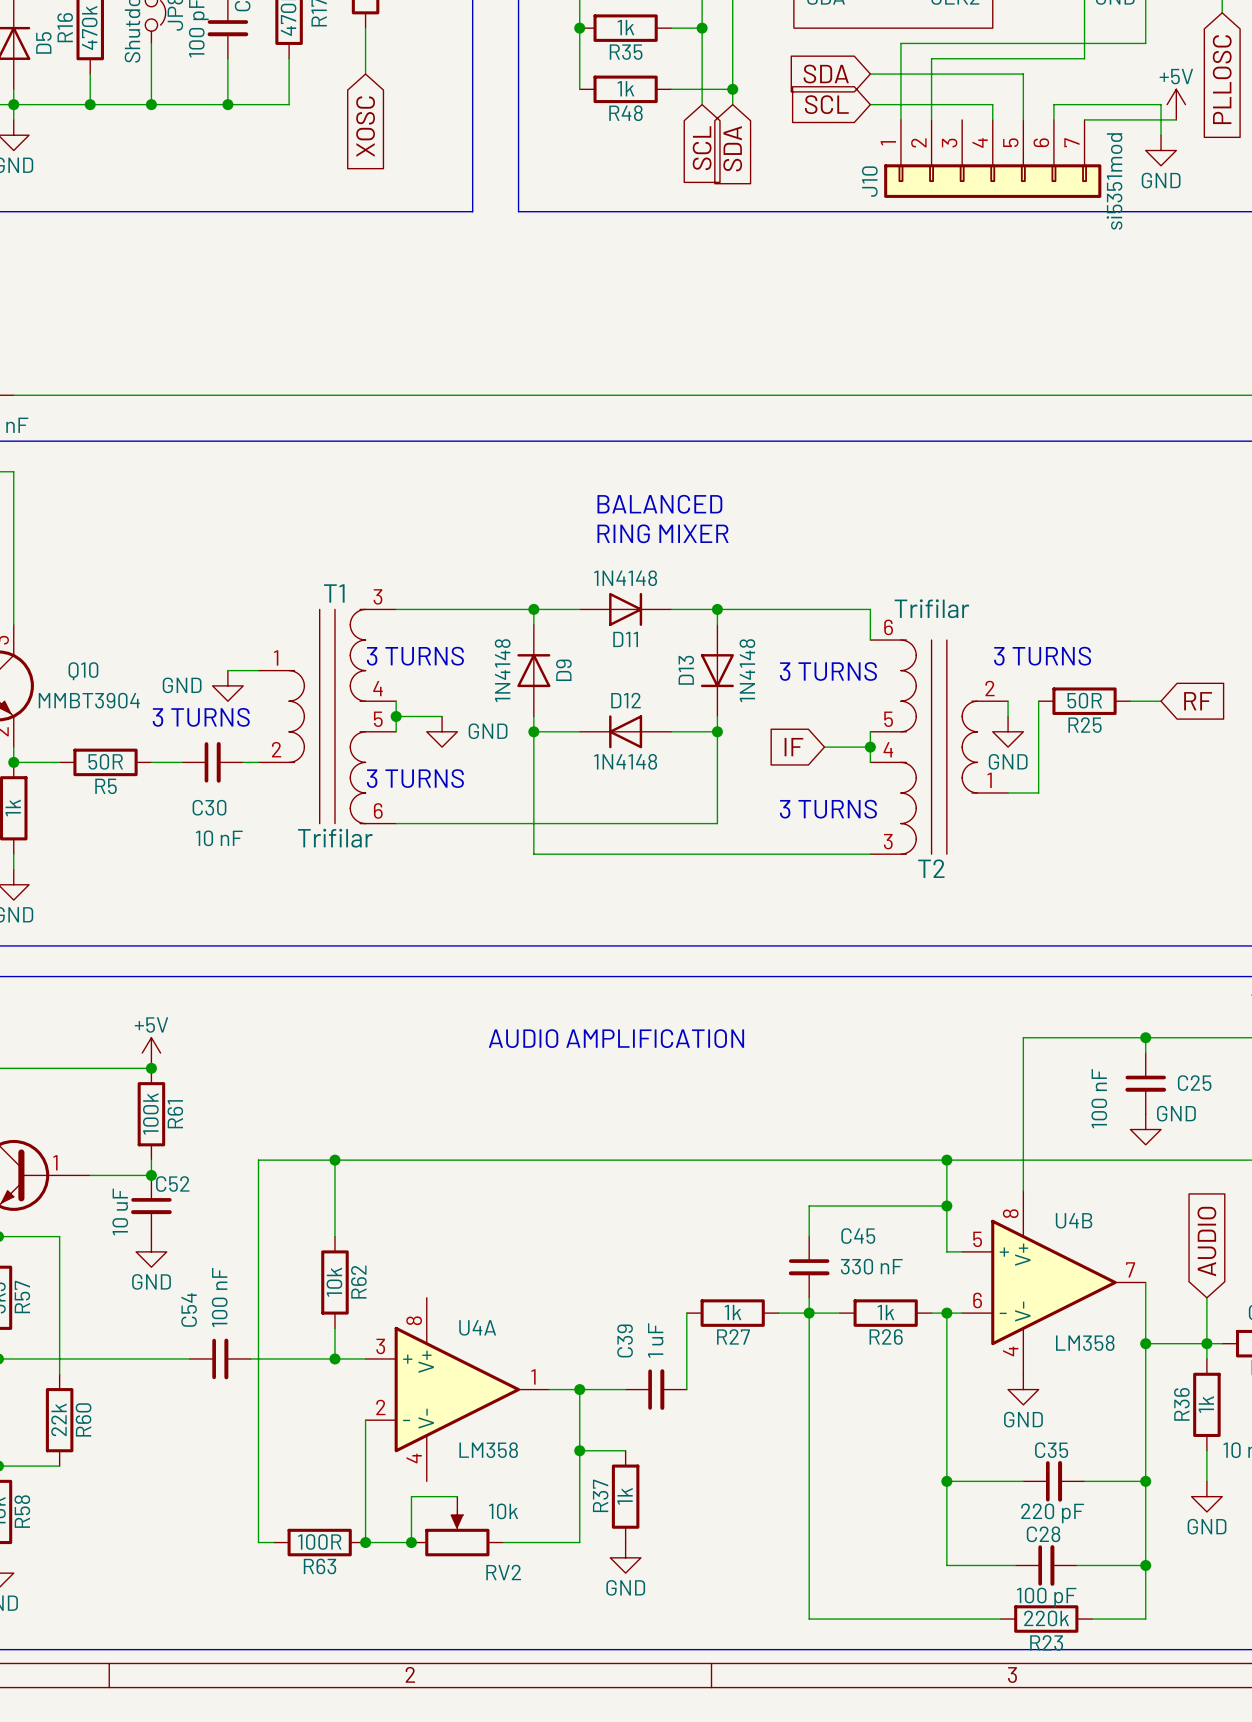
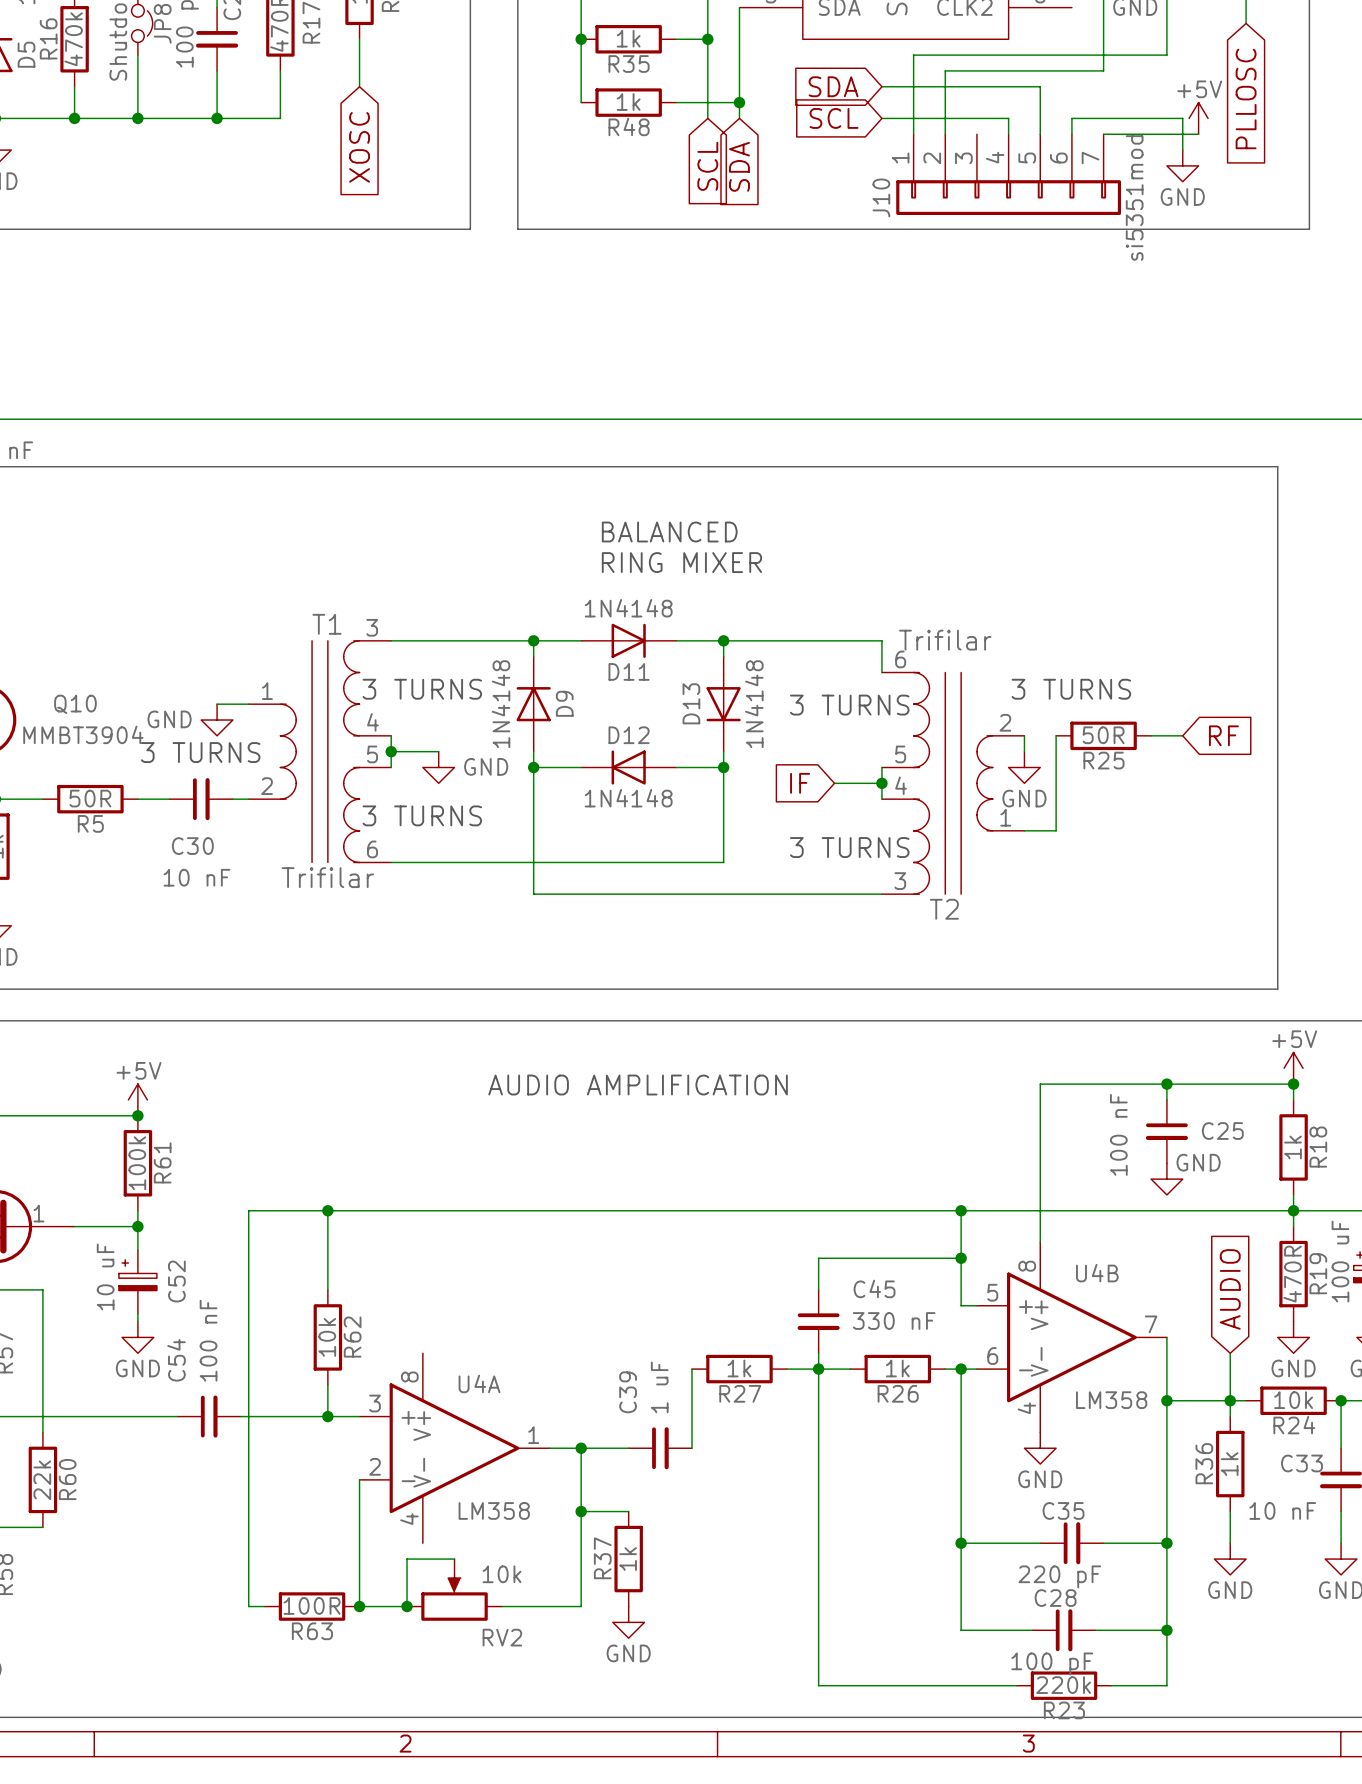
C52 symbol: [131, 1175, 172, 1237] -> [118, 1250, 157, 1314]
power symbol position: GND (151, 1251) -> GND (137, 1337)
wire: none -> (137, 1313) (137, 1321)

